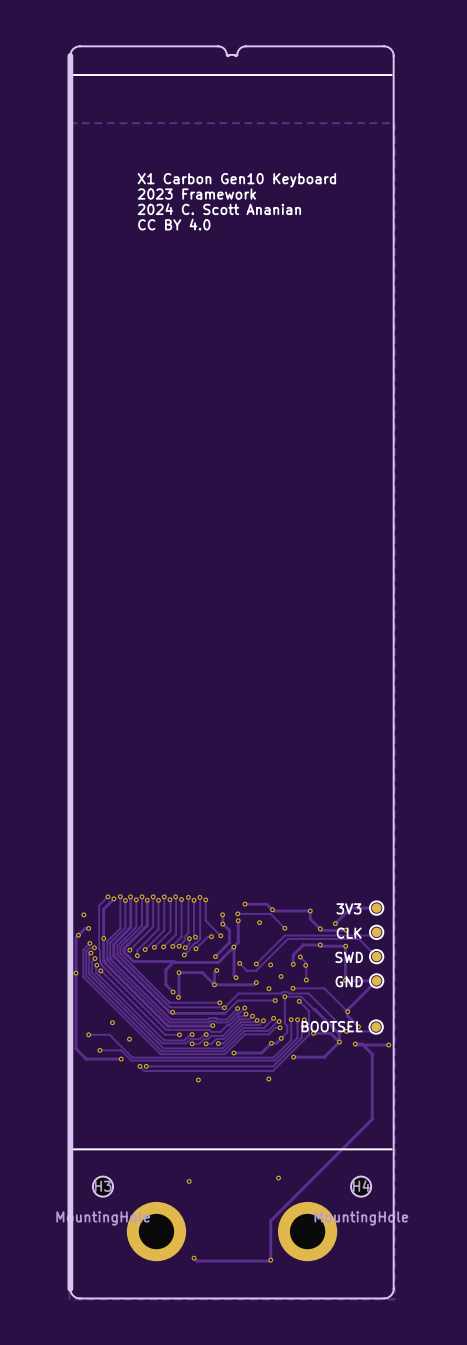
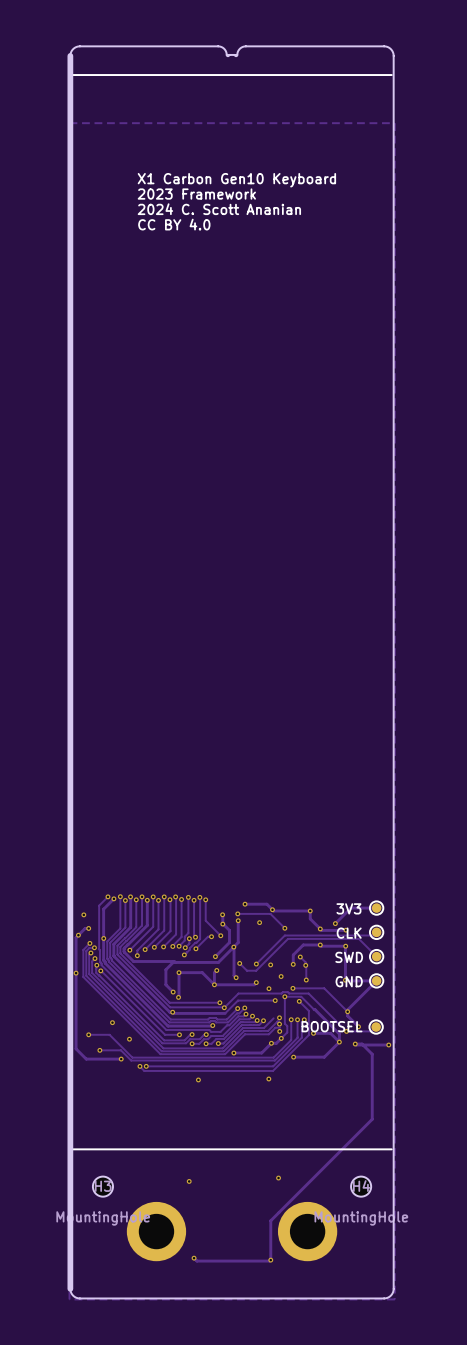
via: none -> (279, 1017)
via: (273, 1018) -> none
via: (279, 1021) -> none
via: none -> (279, 1024)
via: (280, 1027) -> none
via: none -> (279, 1031)

